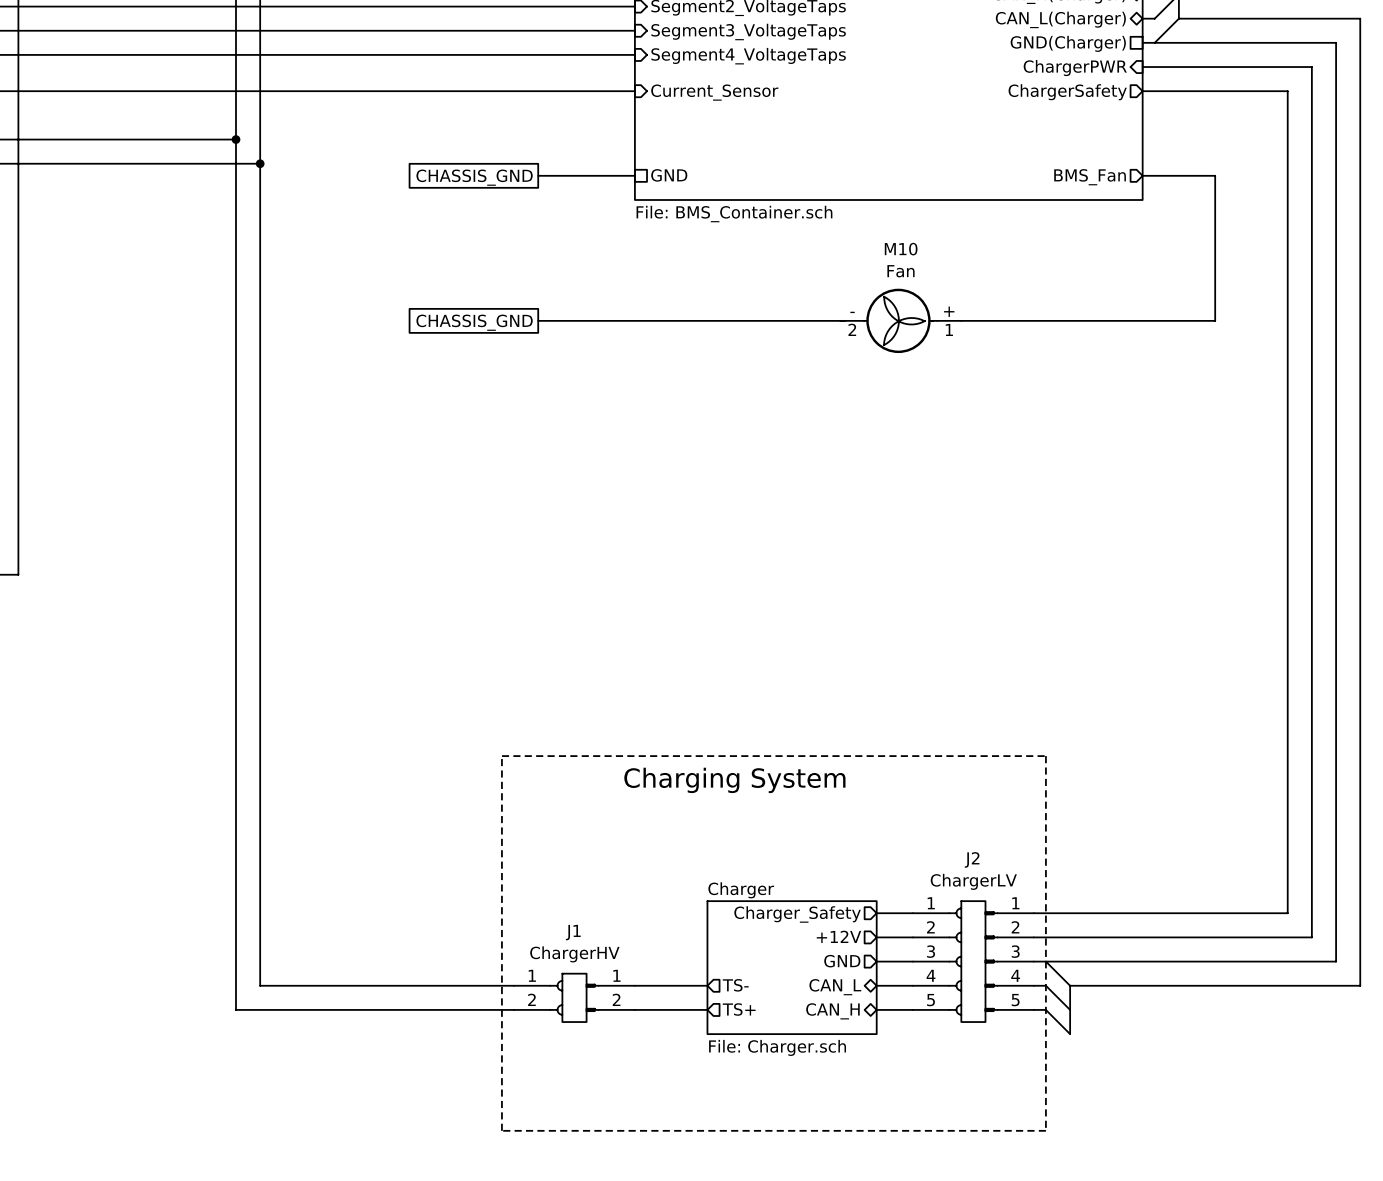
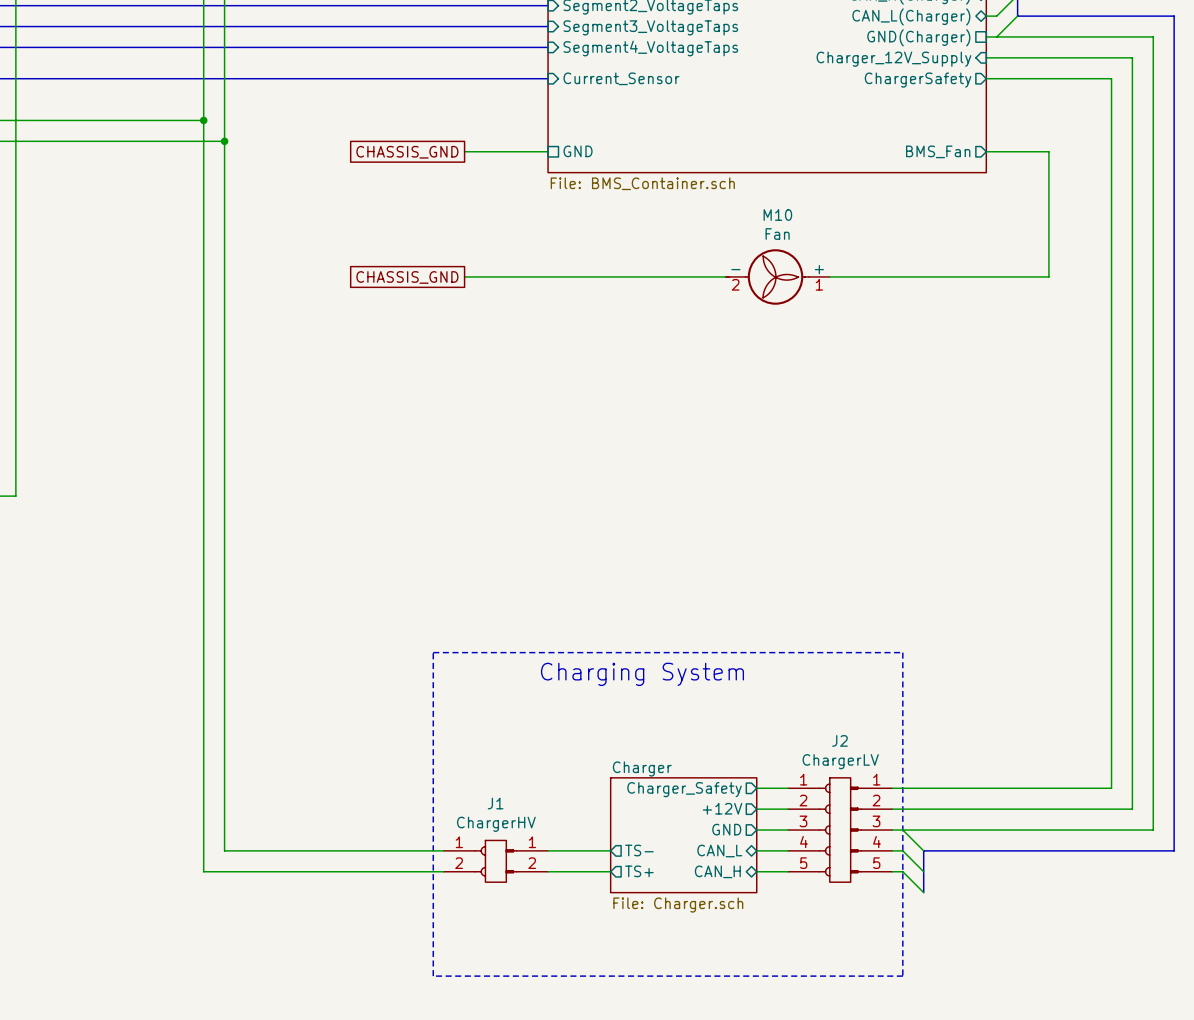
sheet pin: ChargerPWR (1075, 68) -> Charger_12V_Supply (893, 59)

